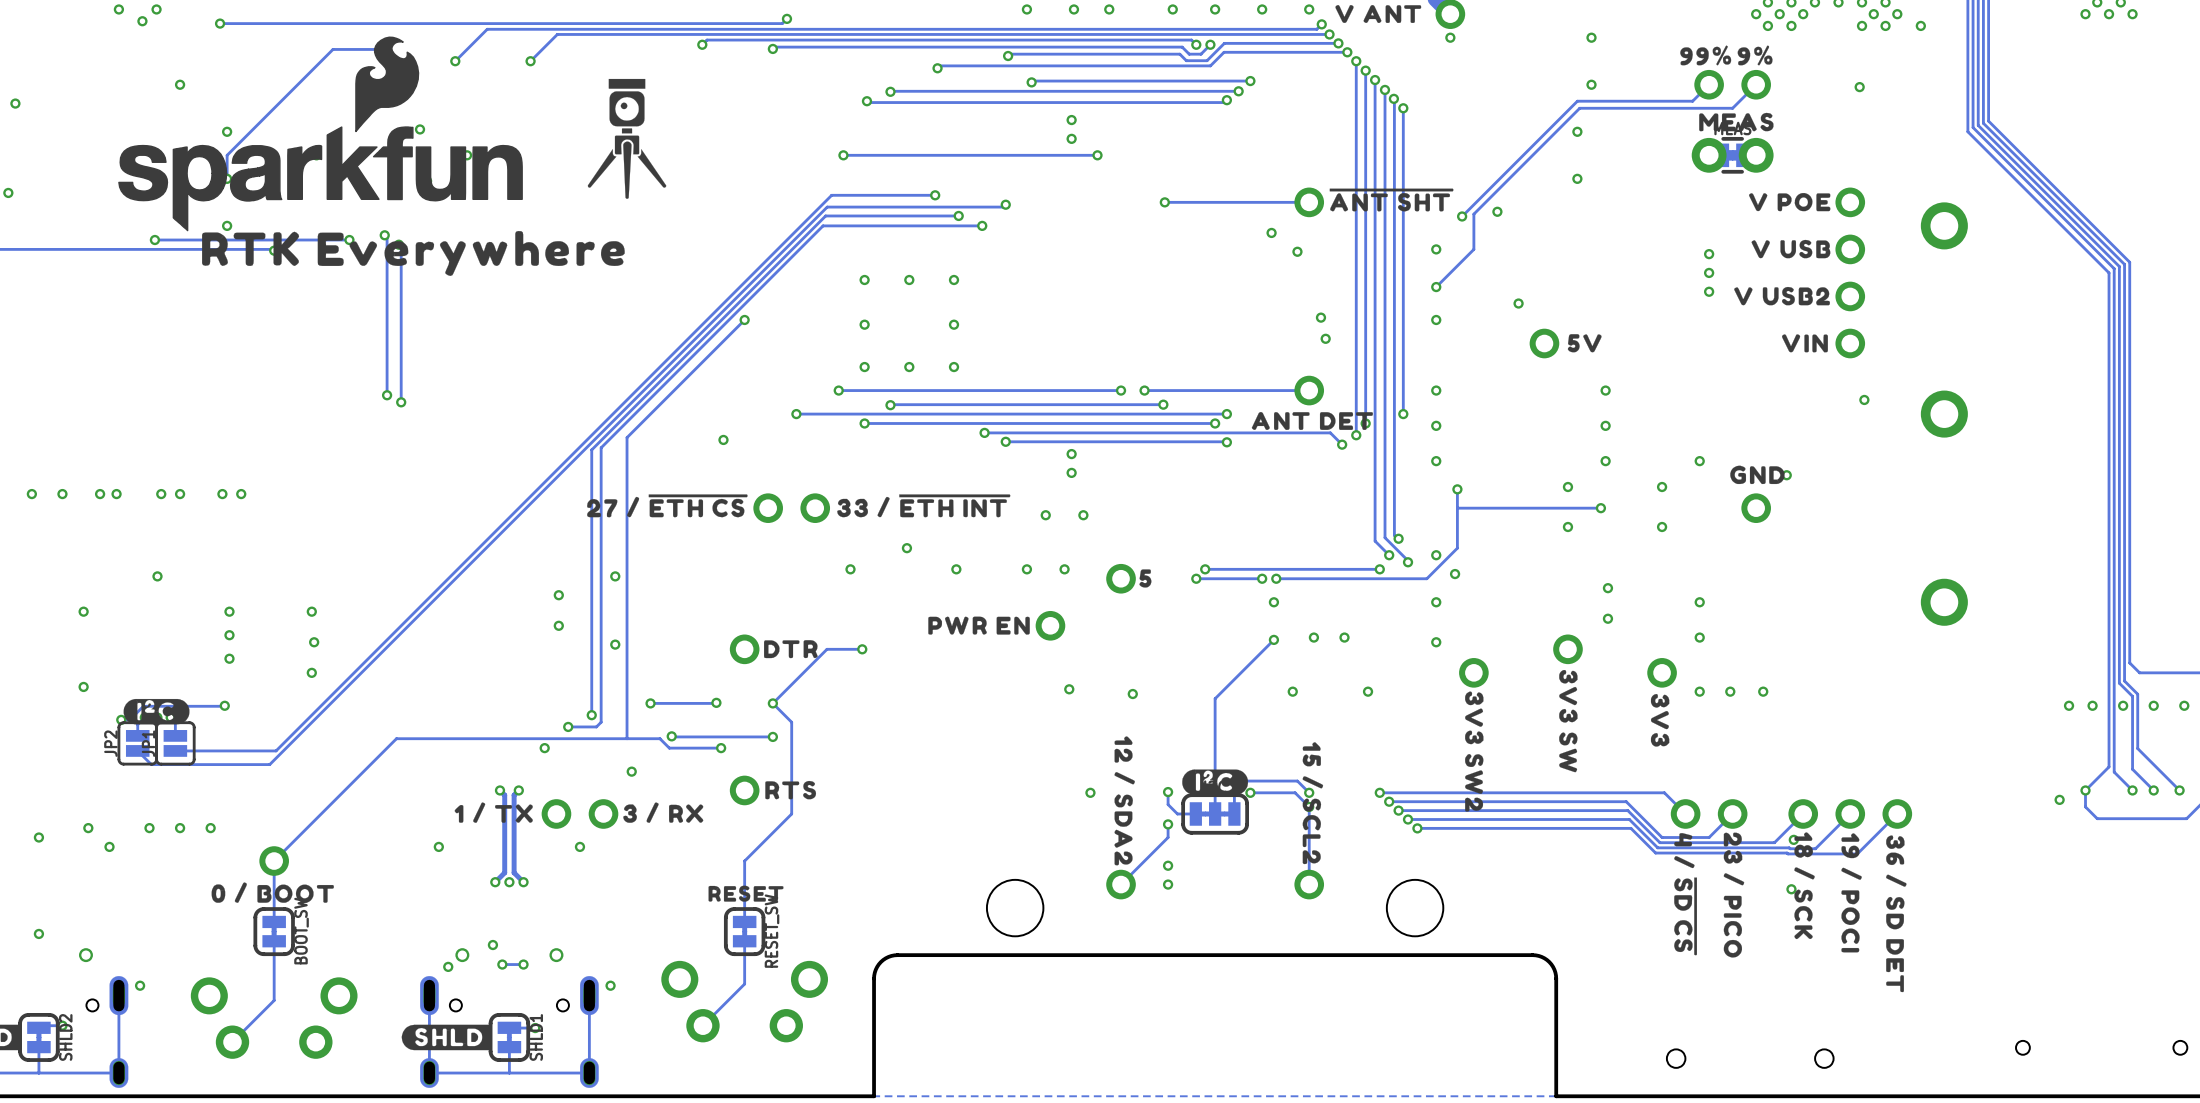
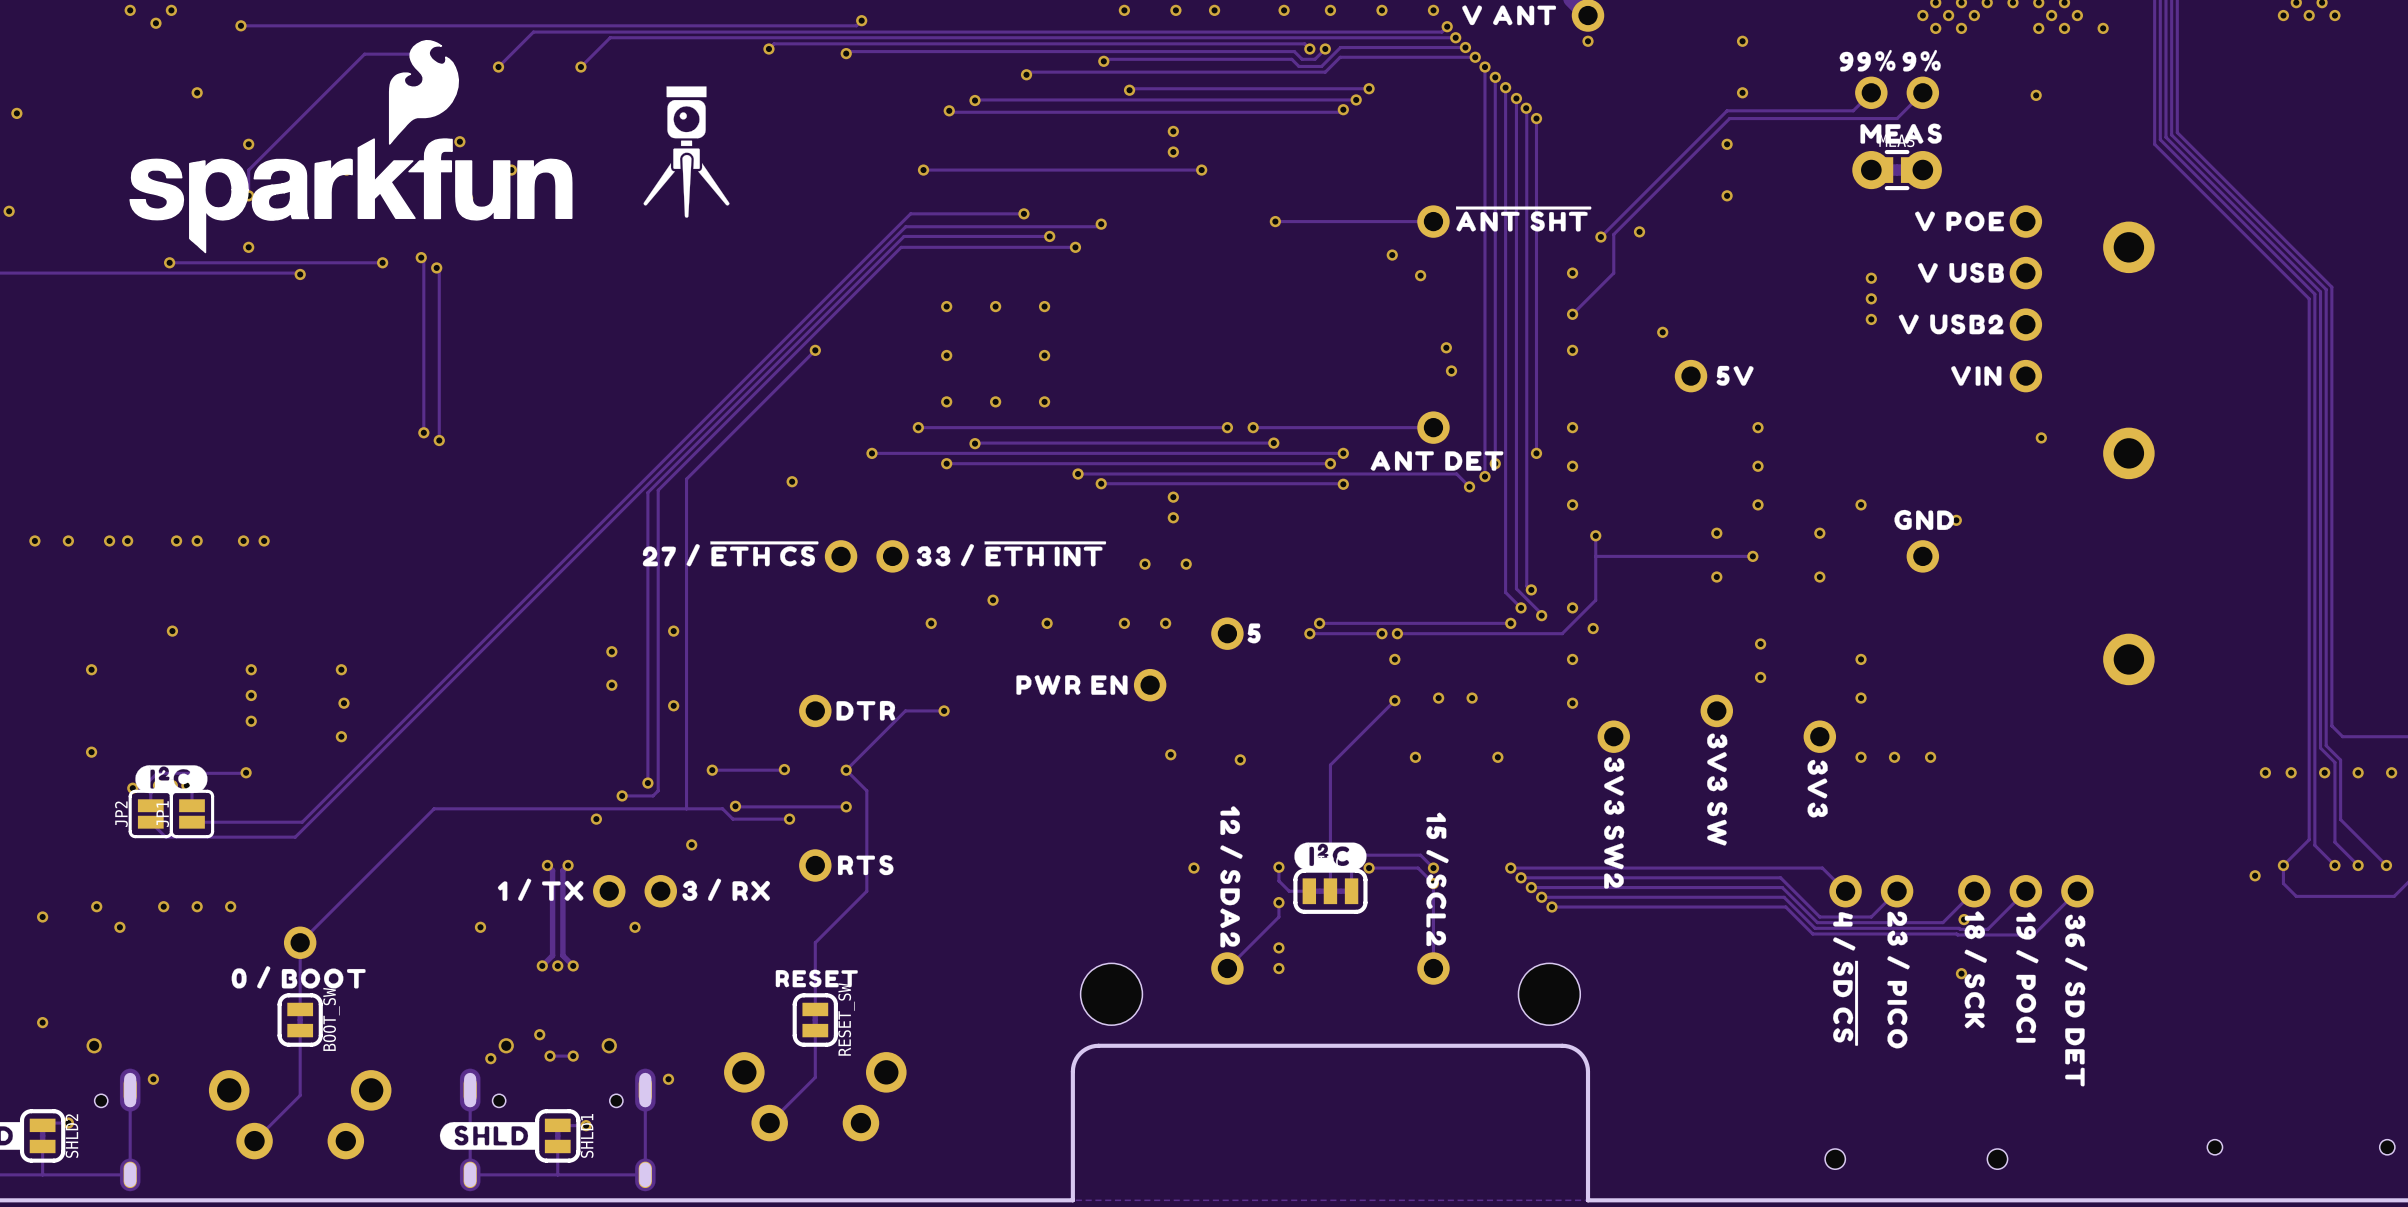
drawing: [202, 230, 625, 276] -> none
board edge: (1003, 955) (897, 955) (888, 956) (880, 962) (875, 969) (874, 978) (874, 1096) -> (1098, 1045) (1082, 1051) (1076, 1058) (1073, 1068) (1072, 1200) (956, 1200)
board edge: (1426, 955) (1532, 955) (1541, 956) (1549, 962) (1554, 969) (1556, 978) (1556, 1096) -> (1562, 1045) (1577, 1051) (1584, 1058) (1587, 1068) (1588, 1200) (1703, 1200)

